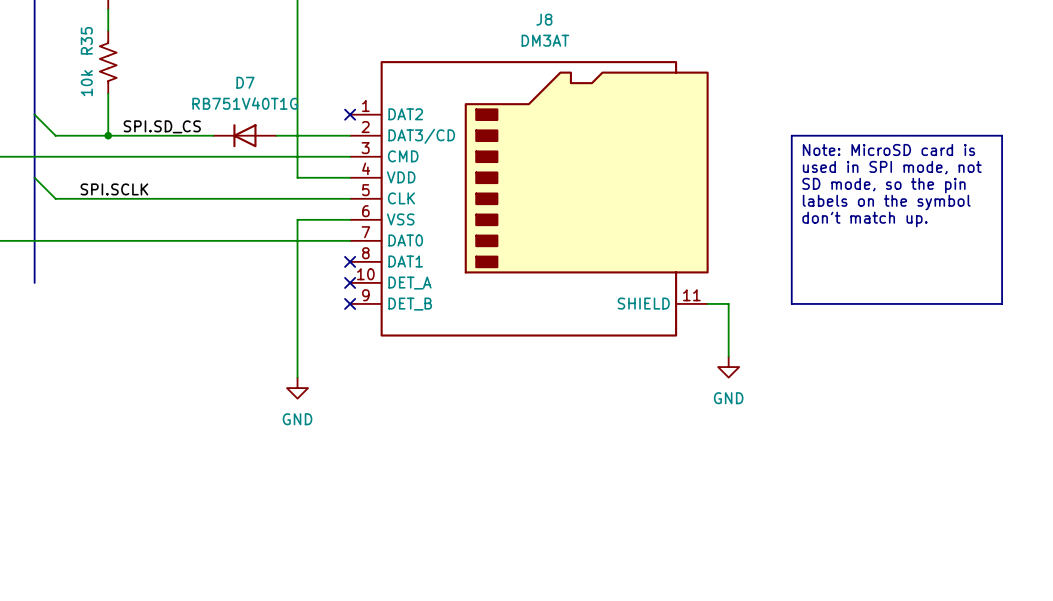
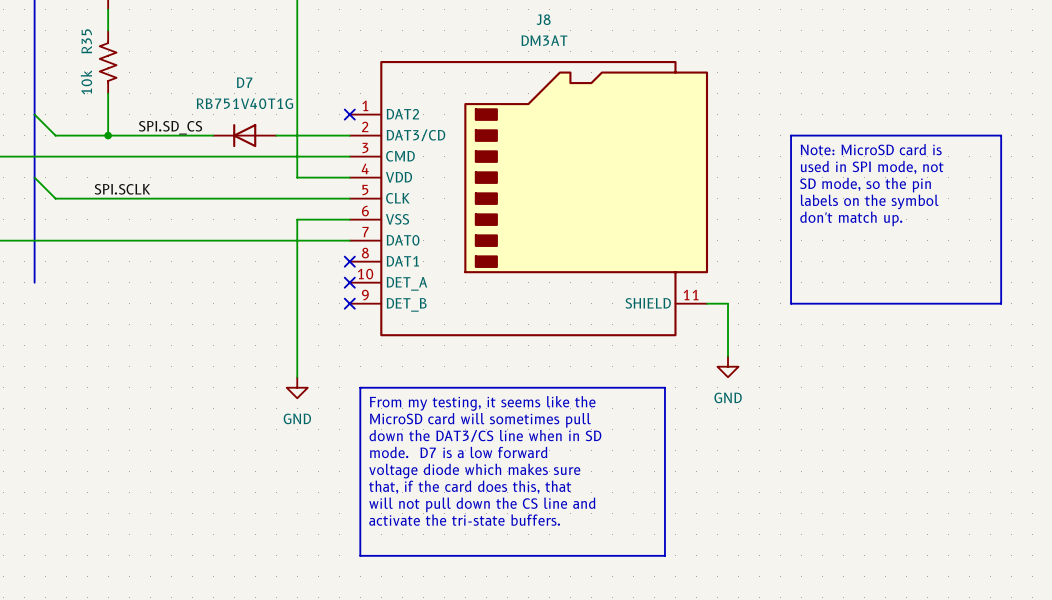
line: none -> (360, 387) (664, 387) (664, 555) (360, 555) (360, 387)
text: none -> From my testing, it seems like the (482, 403)
text: none -> MicroSD card will sometimes pull (480, 420)
text: none -> down the DAT3/CS line when in SD (485, 435)
text: none -> mode. D7 is a low forward (458, 452)
text: none -> voltage diode which makes sure (474, 471)
text: none -> that, if the card does this, that (470, 487)
text: none -> will not pull down the CS line and (482, 504)
text: none -> activate the tri-state buffers. (464, 520)

